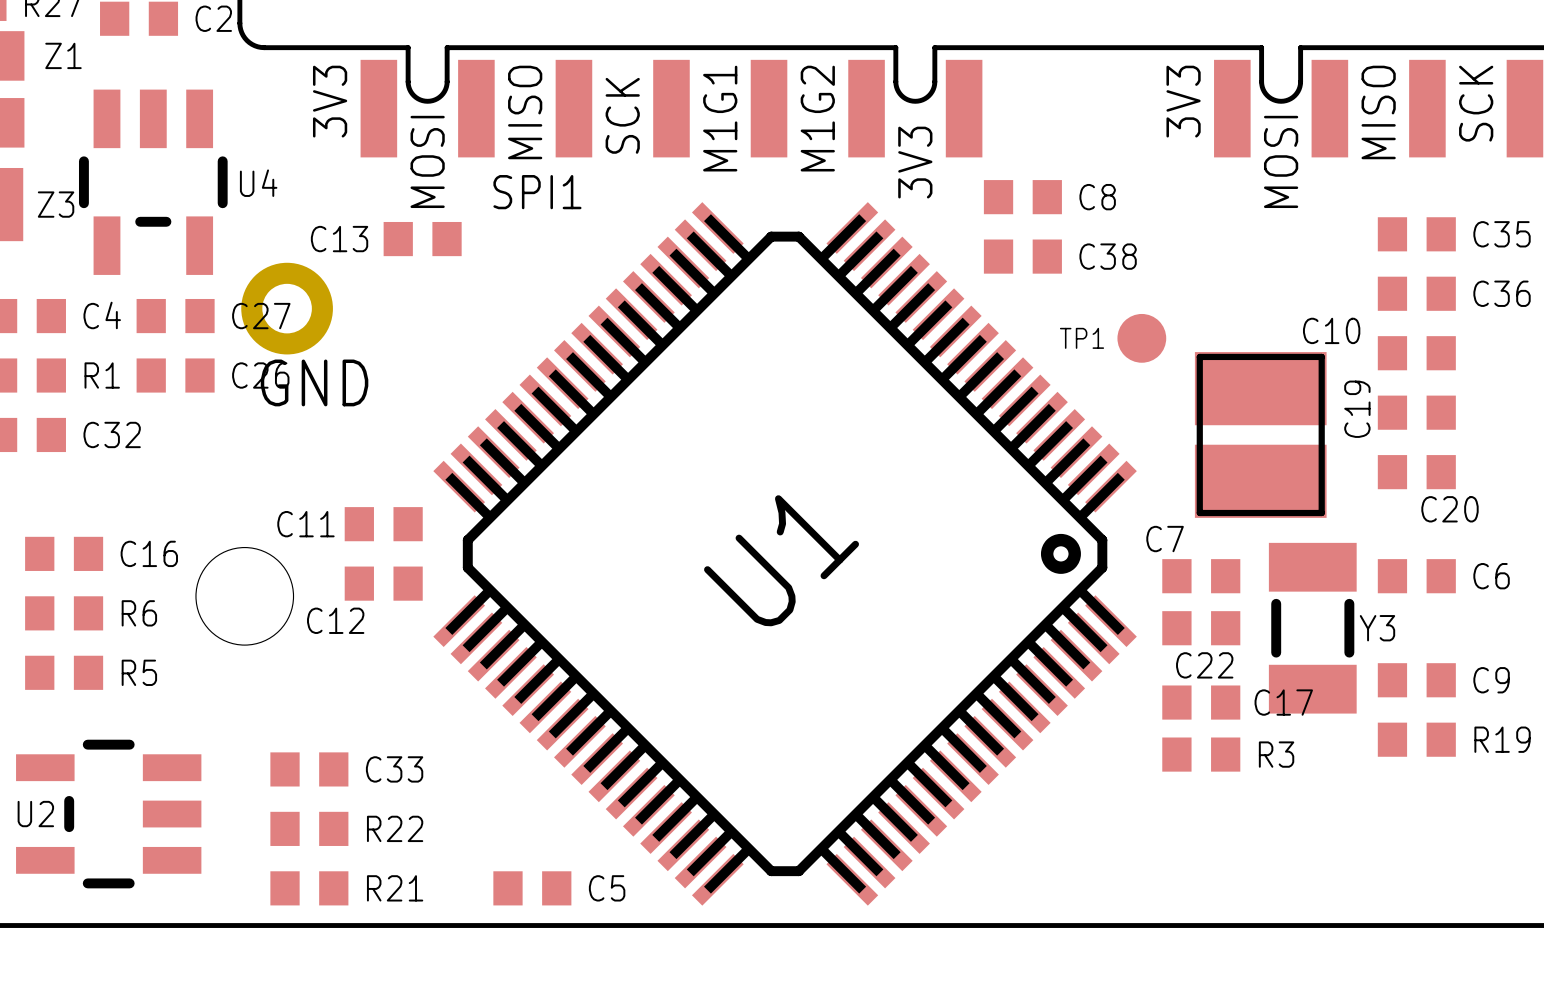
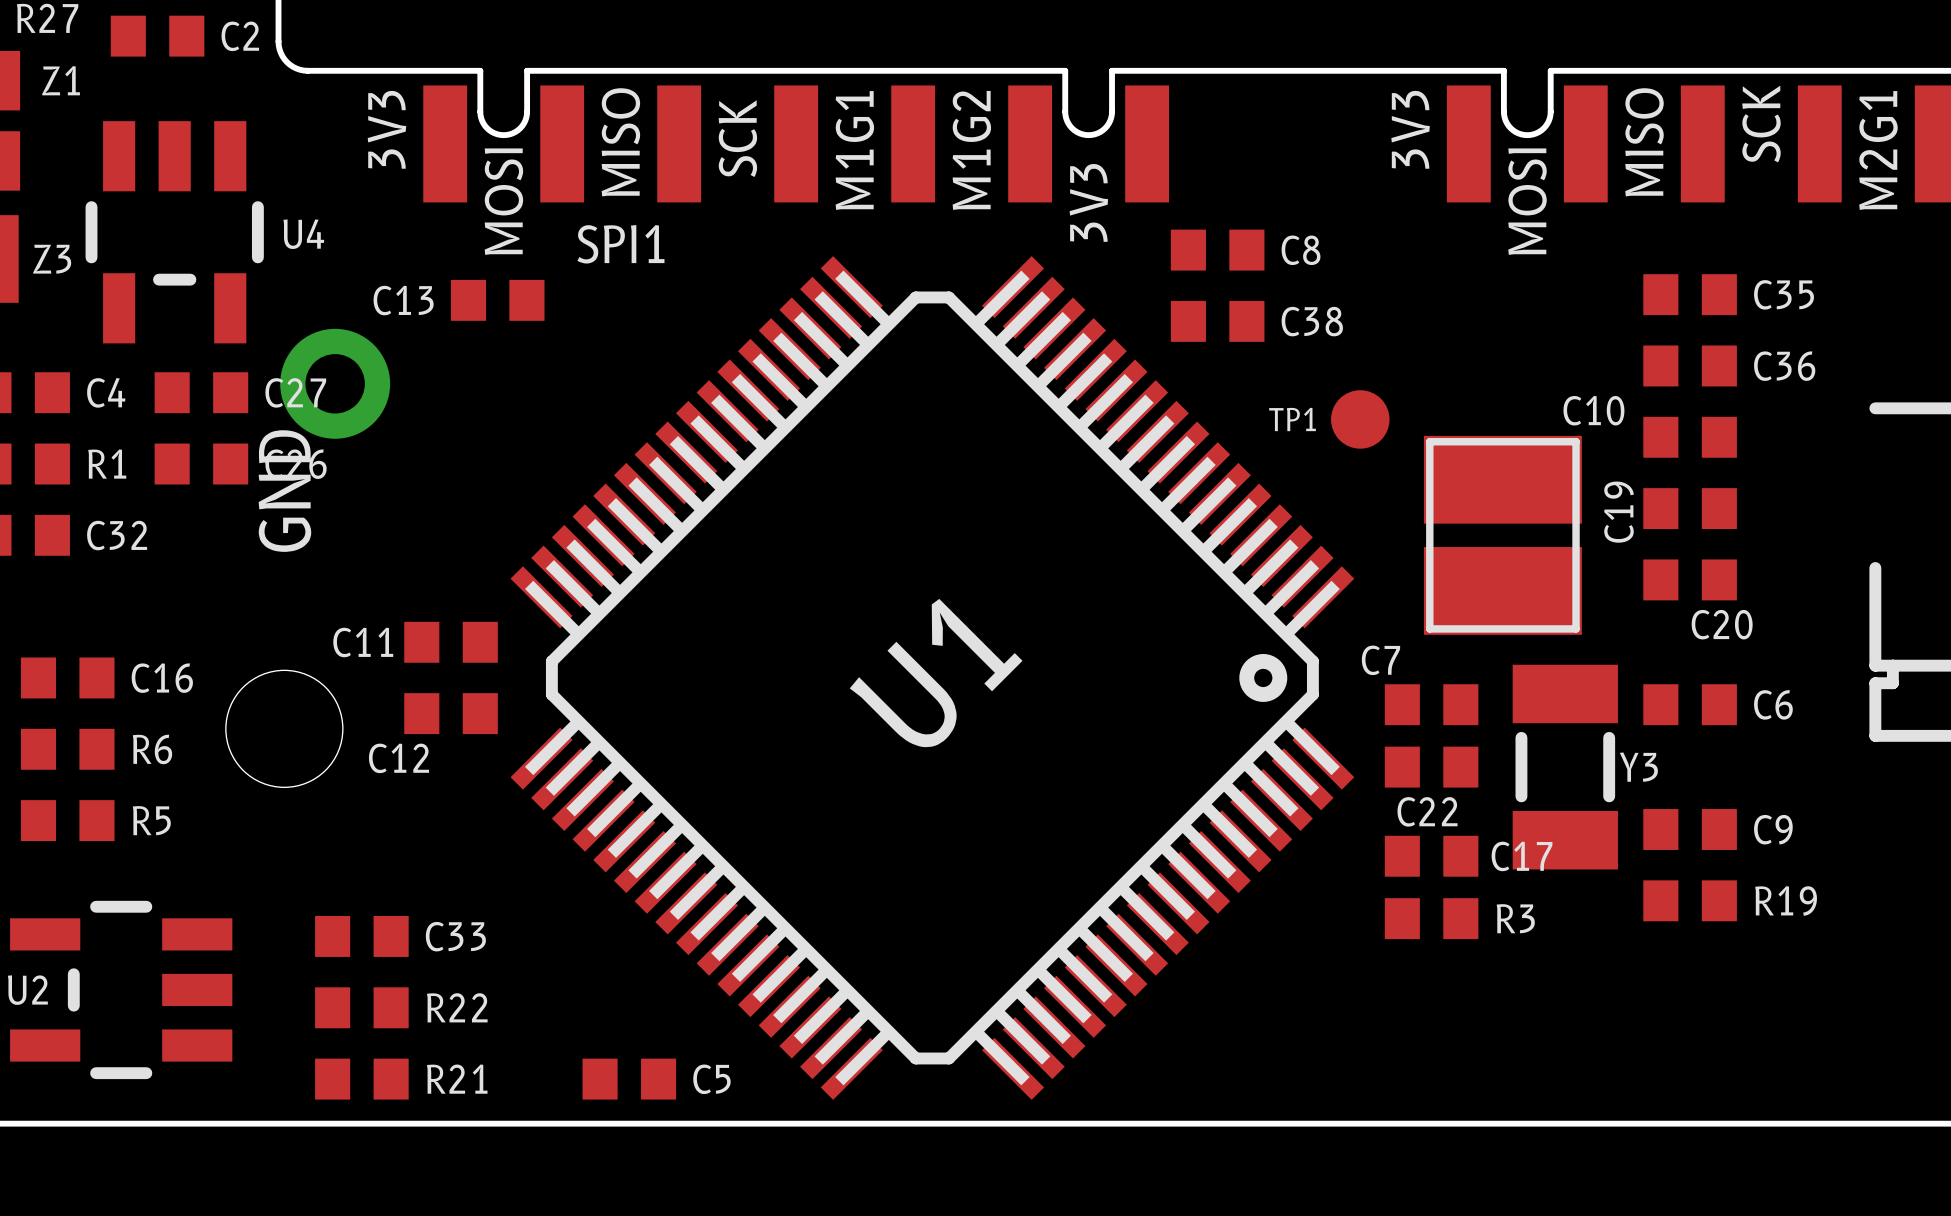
text rotation: 0° (314, 382) -> 90° counterclockwise (284, 491)

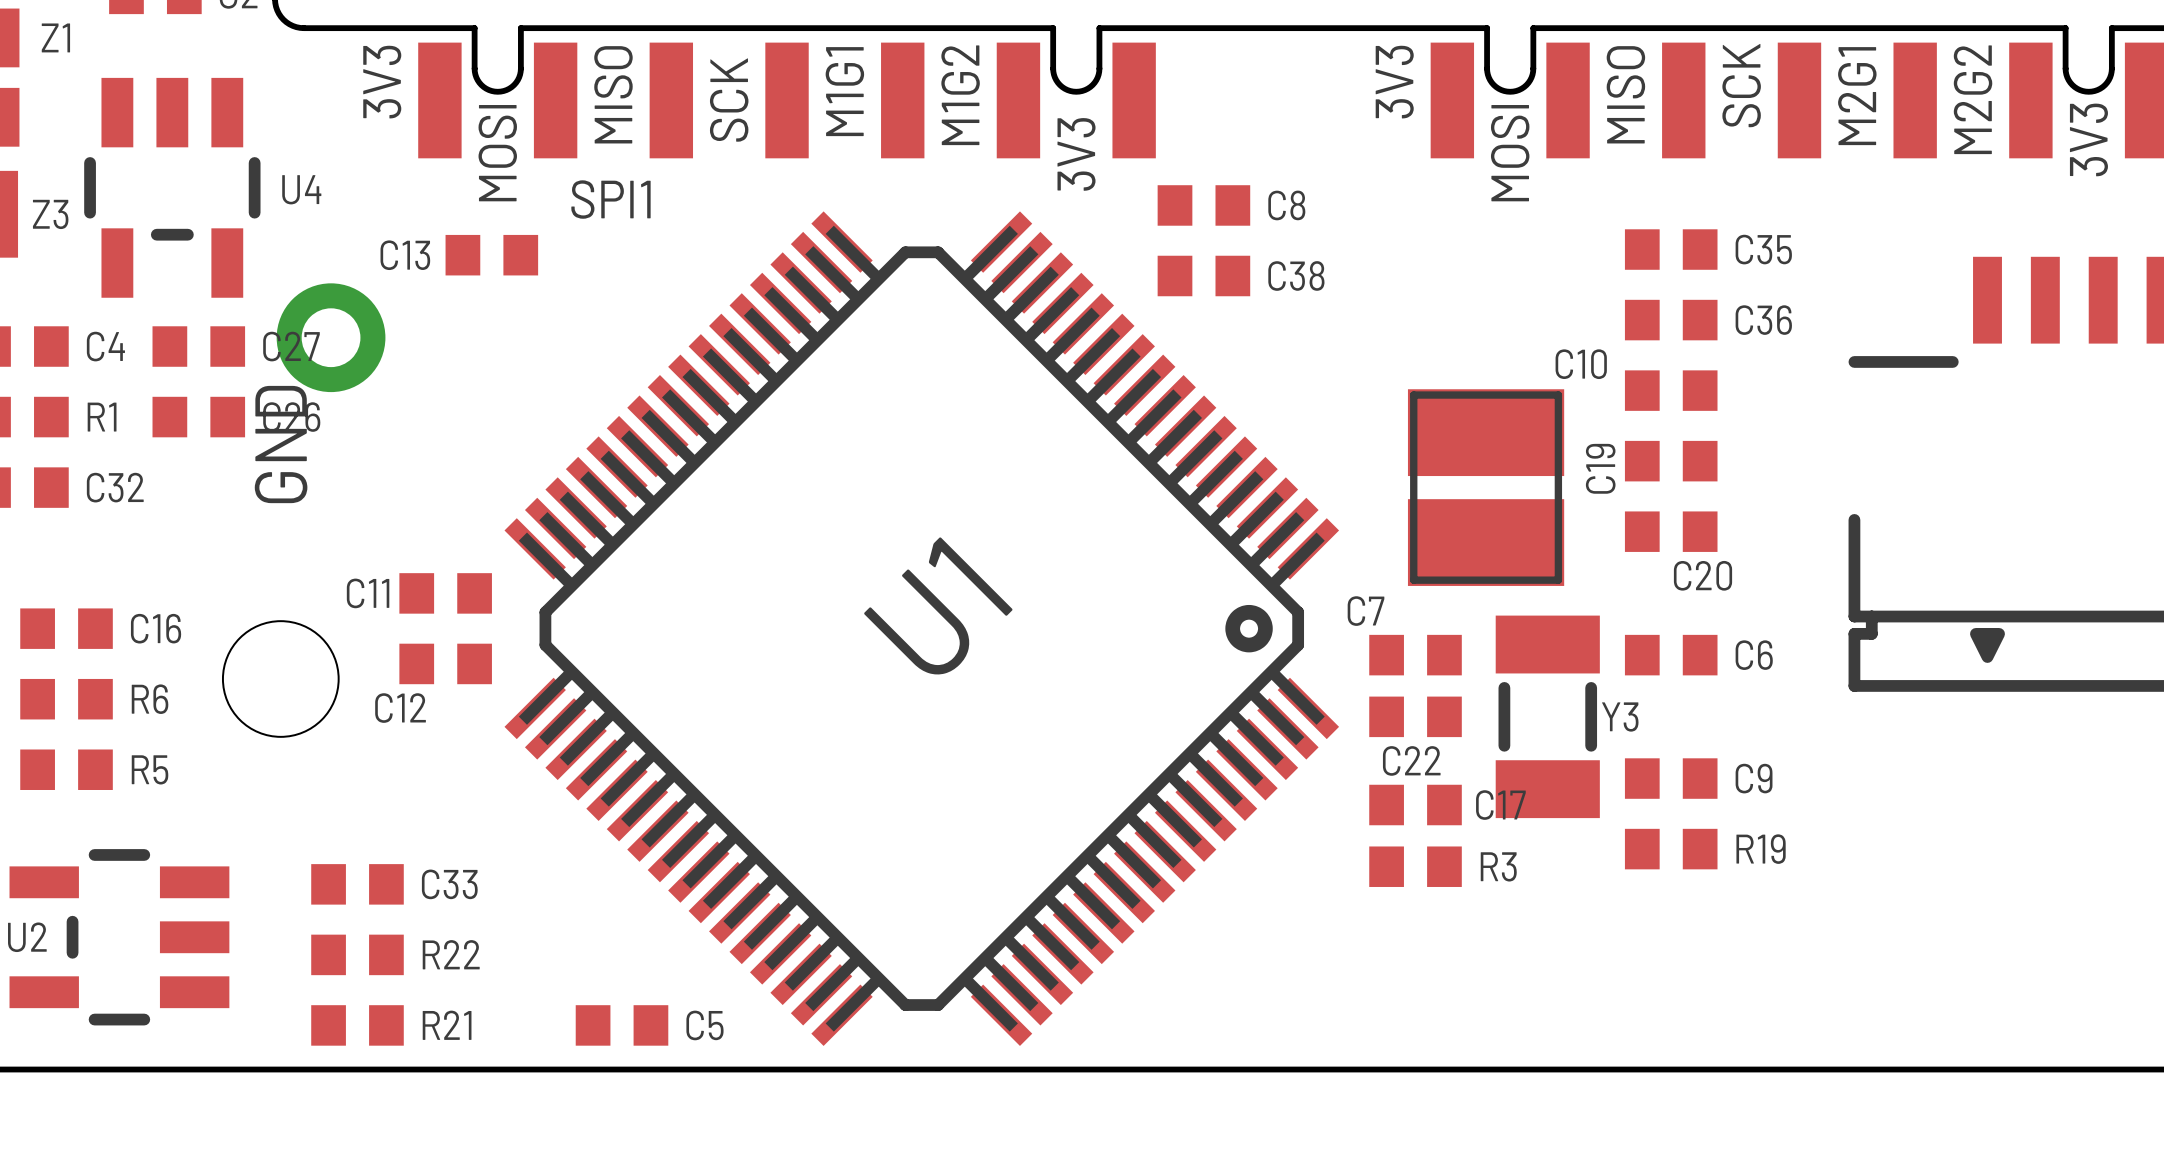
TP1: (1360, 419) -> none

